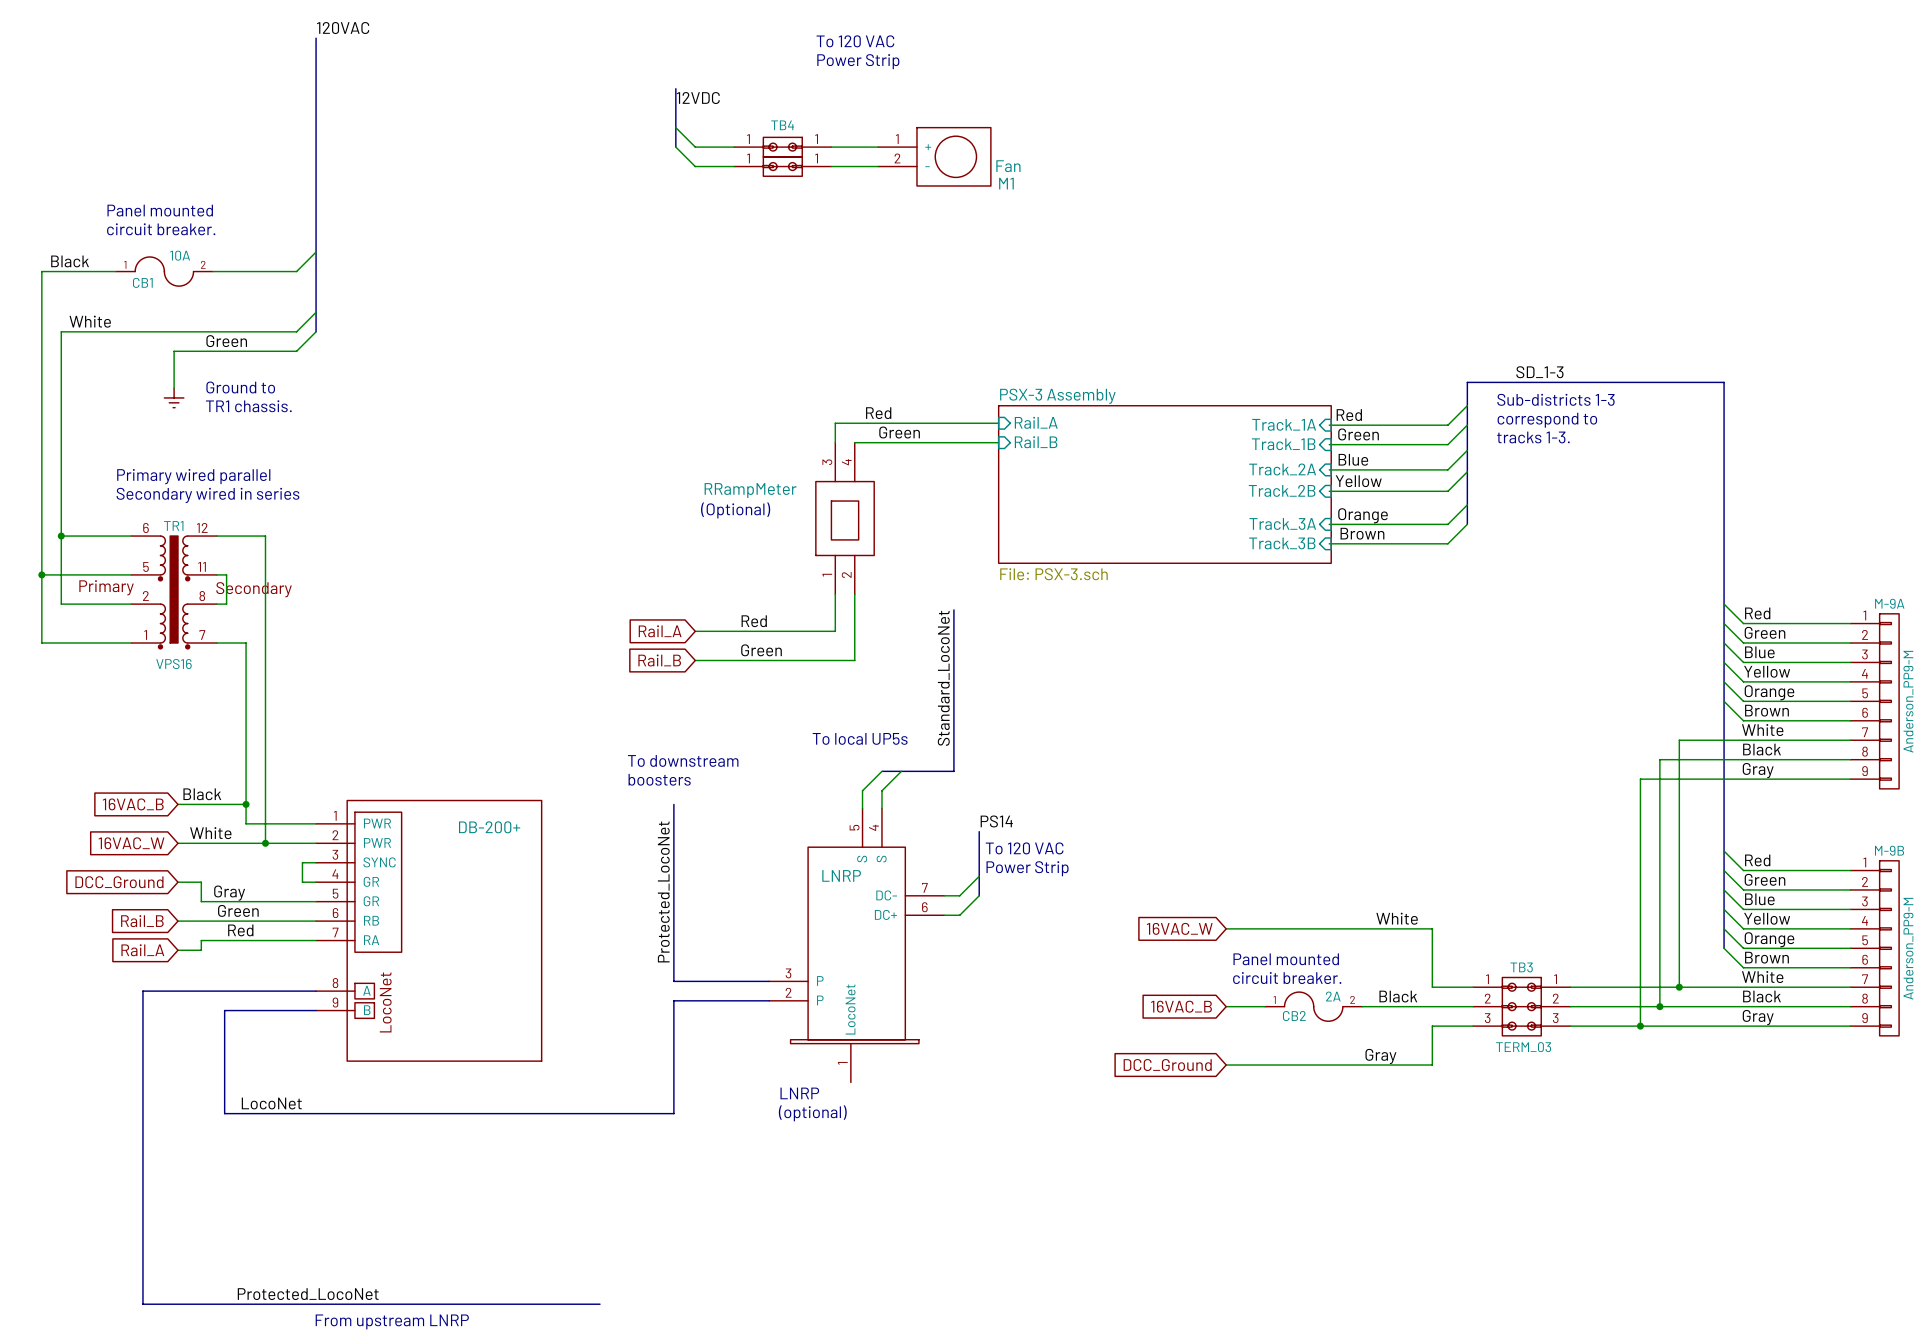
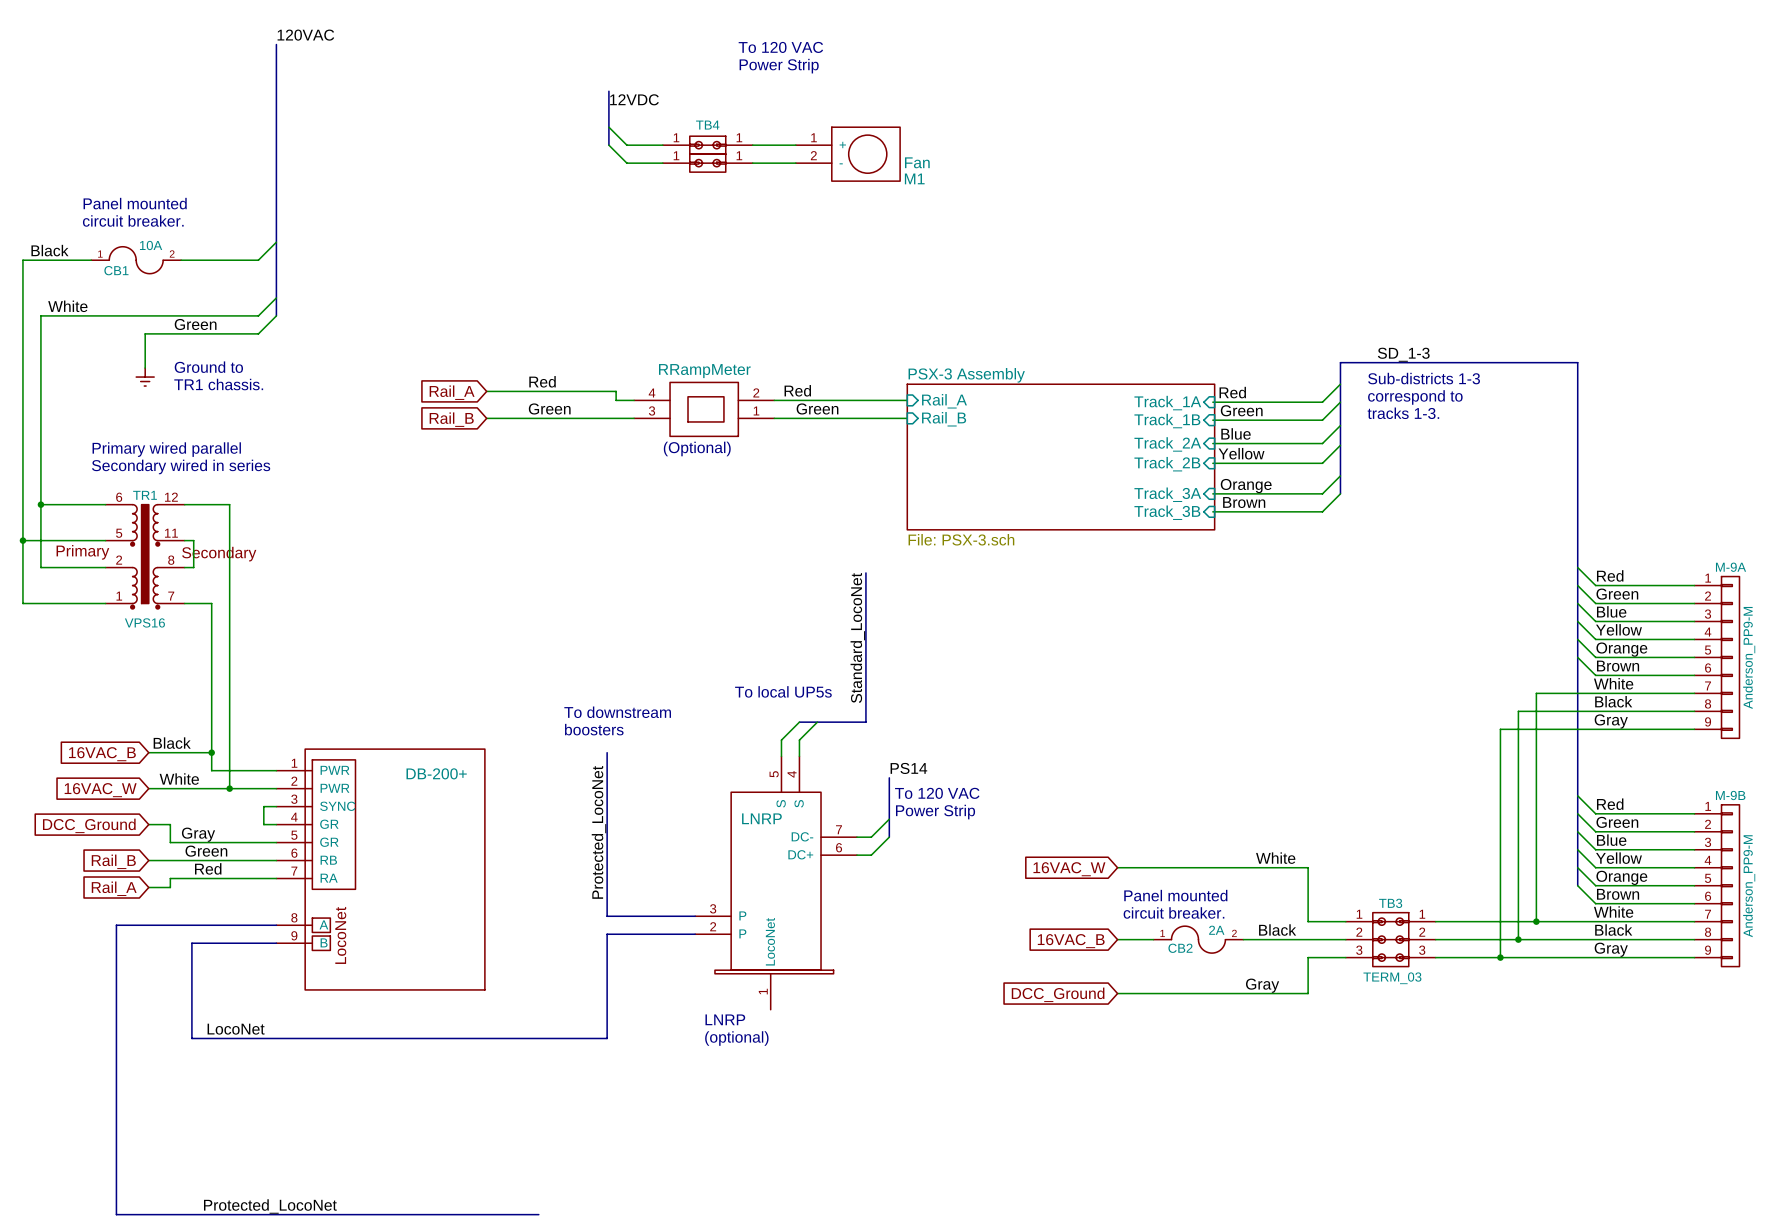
label: none -> Red (542, 381)
global label: none -> Rail_A (452, 392)
wire: none -> (486, 391) (616, 391) (616, 400) (634, 400)
label: none -> Green (549, 408)
global label: none -> Rail_B (451, 419)
wire: none -> (486, 418) (634, 418)
part value position: RRampMeter (750, 490) -> RRampMeter (704, 371)
text position: (Optional) (735, 510) -> (Optional) (697, 448)
part rotation: 0° (845, 518) -> 90° counterclockwise (704, 409)
part position: (845, 518) -> (704, 409)
wire: (835, 594) (835, 631) (695, 631) -> none
wire: (854, 594) (854, 660) (695, 660) -> none
label: Red (754, 621) -> none
global label: Rail_A (660, 631) -> none
label: Green (761, 650) -> none
global label: Rail_B (659, 660) -> none

